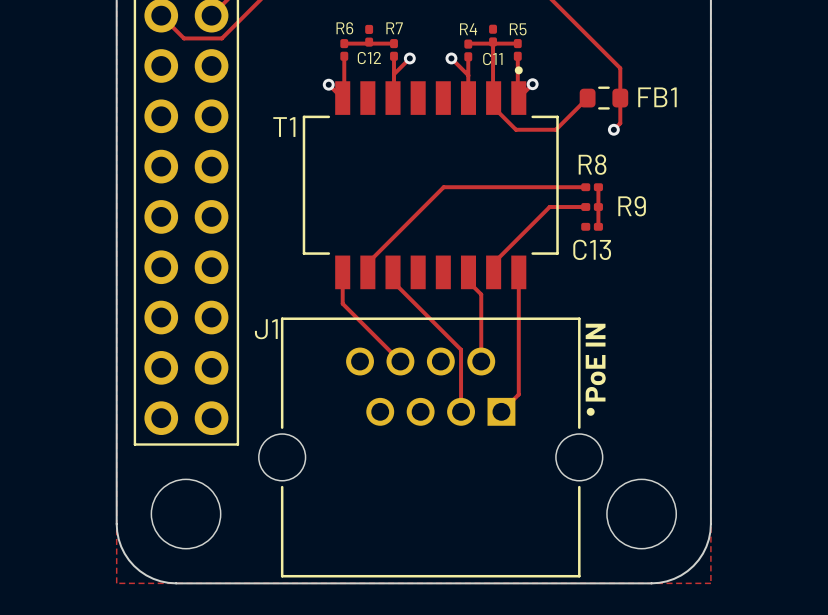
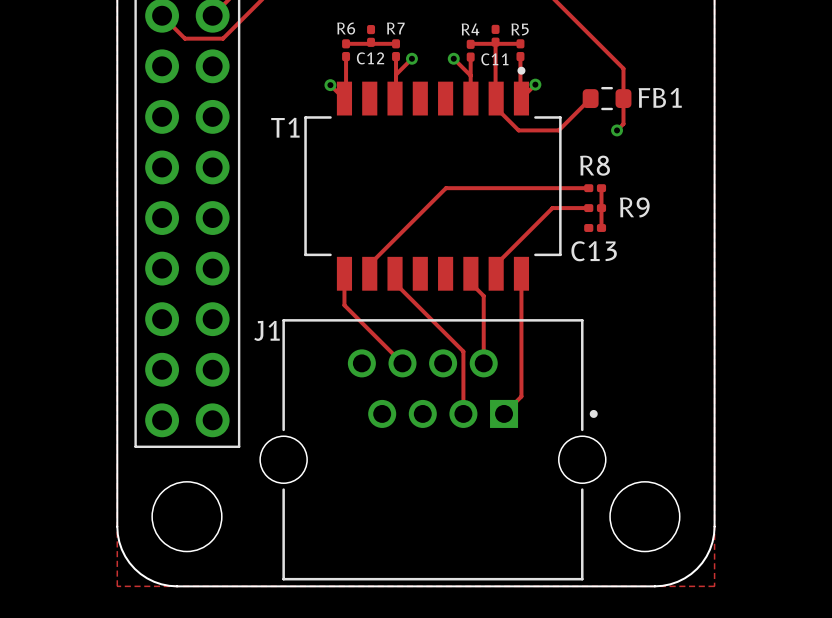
text: PoE IN (595, 362) -> none

